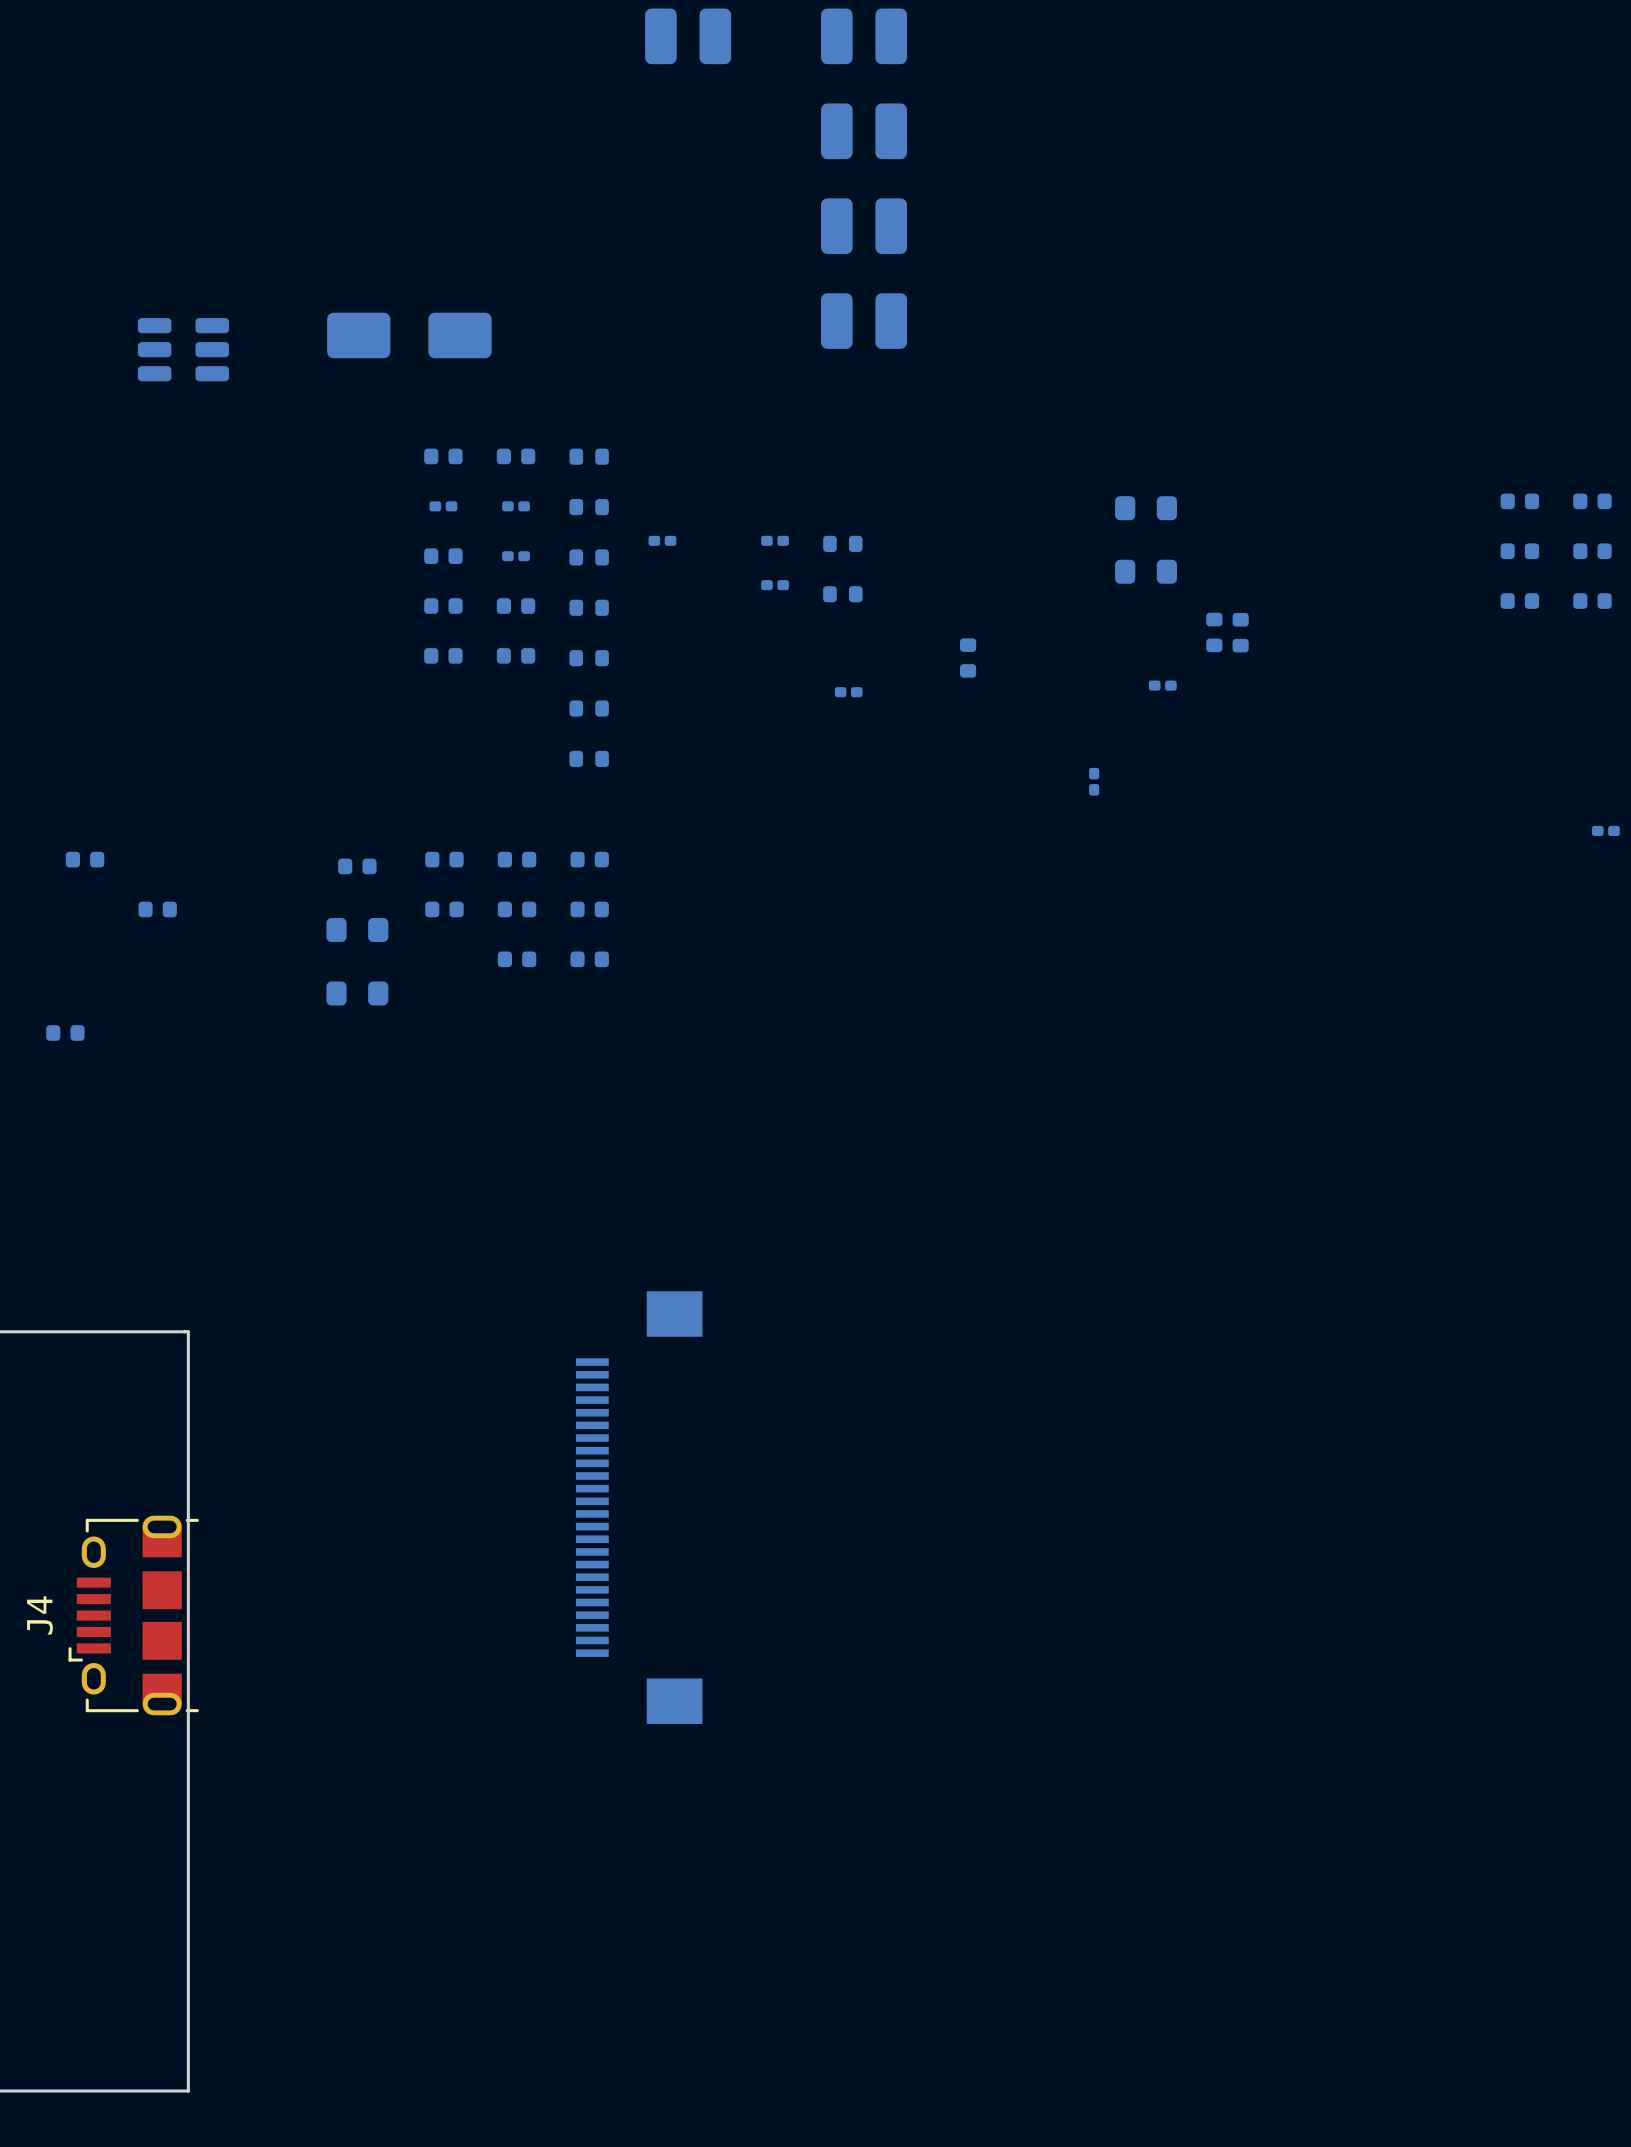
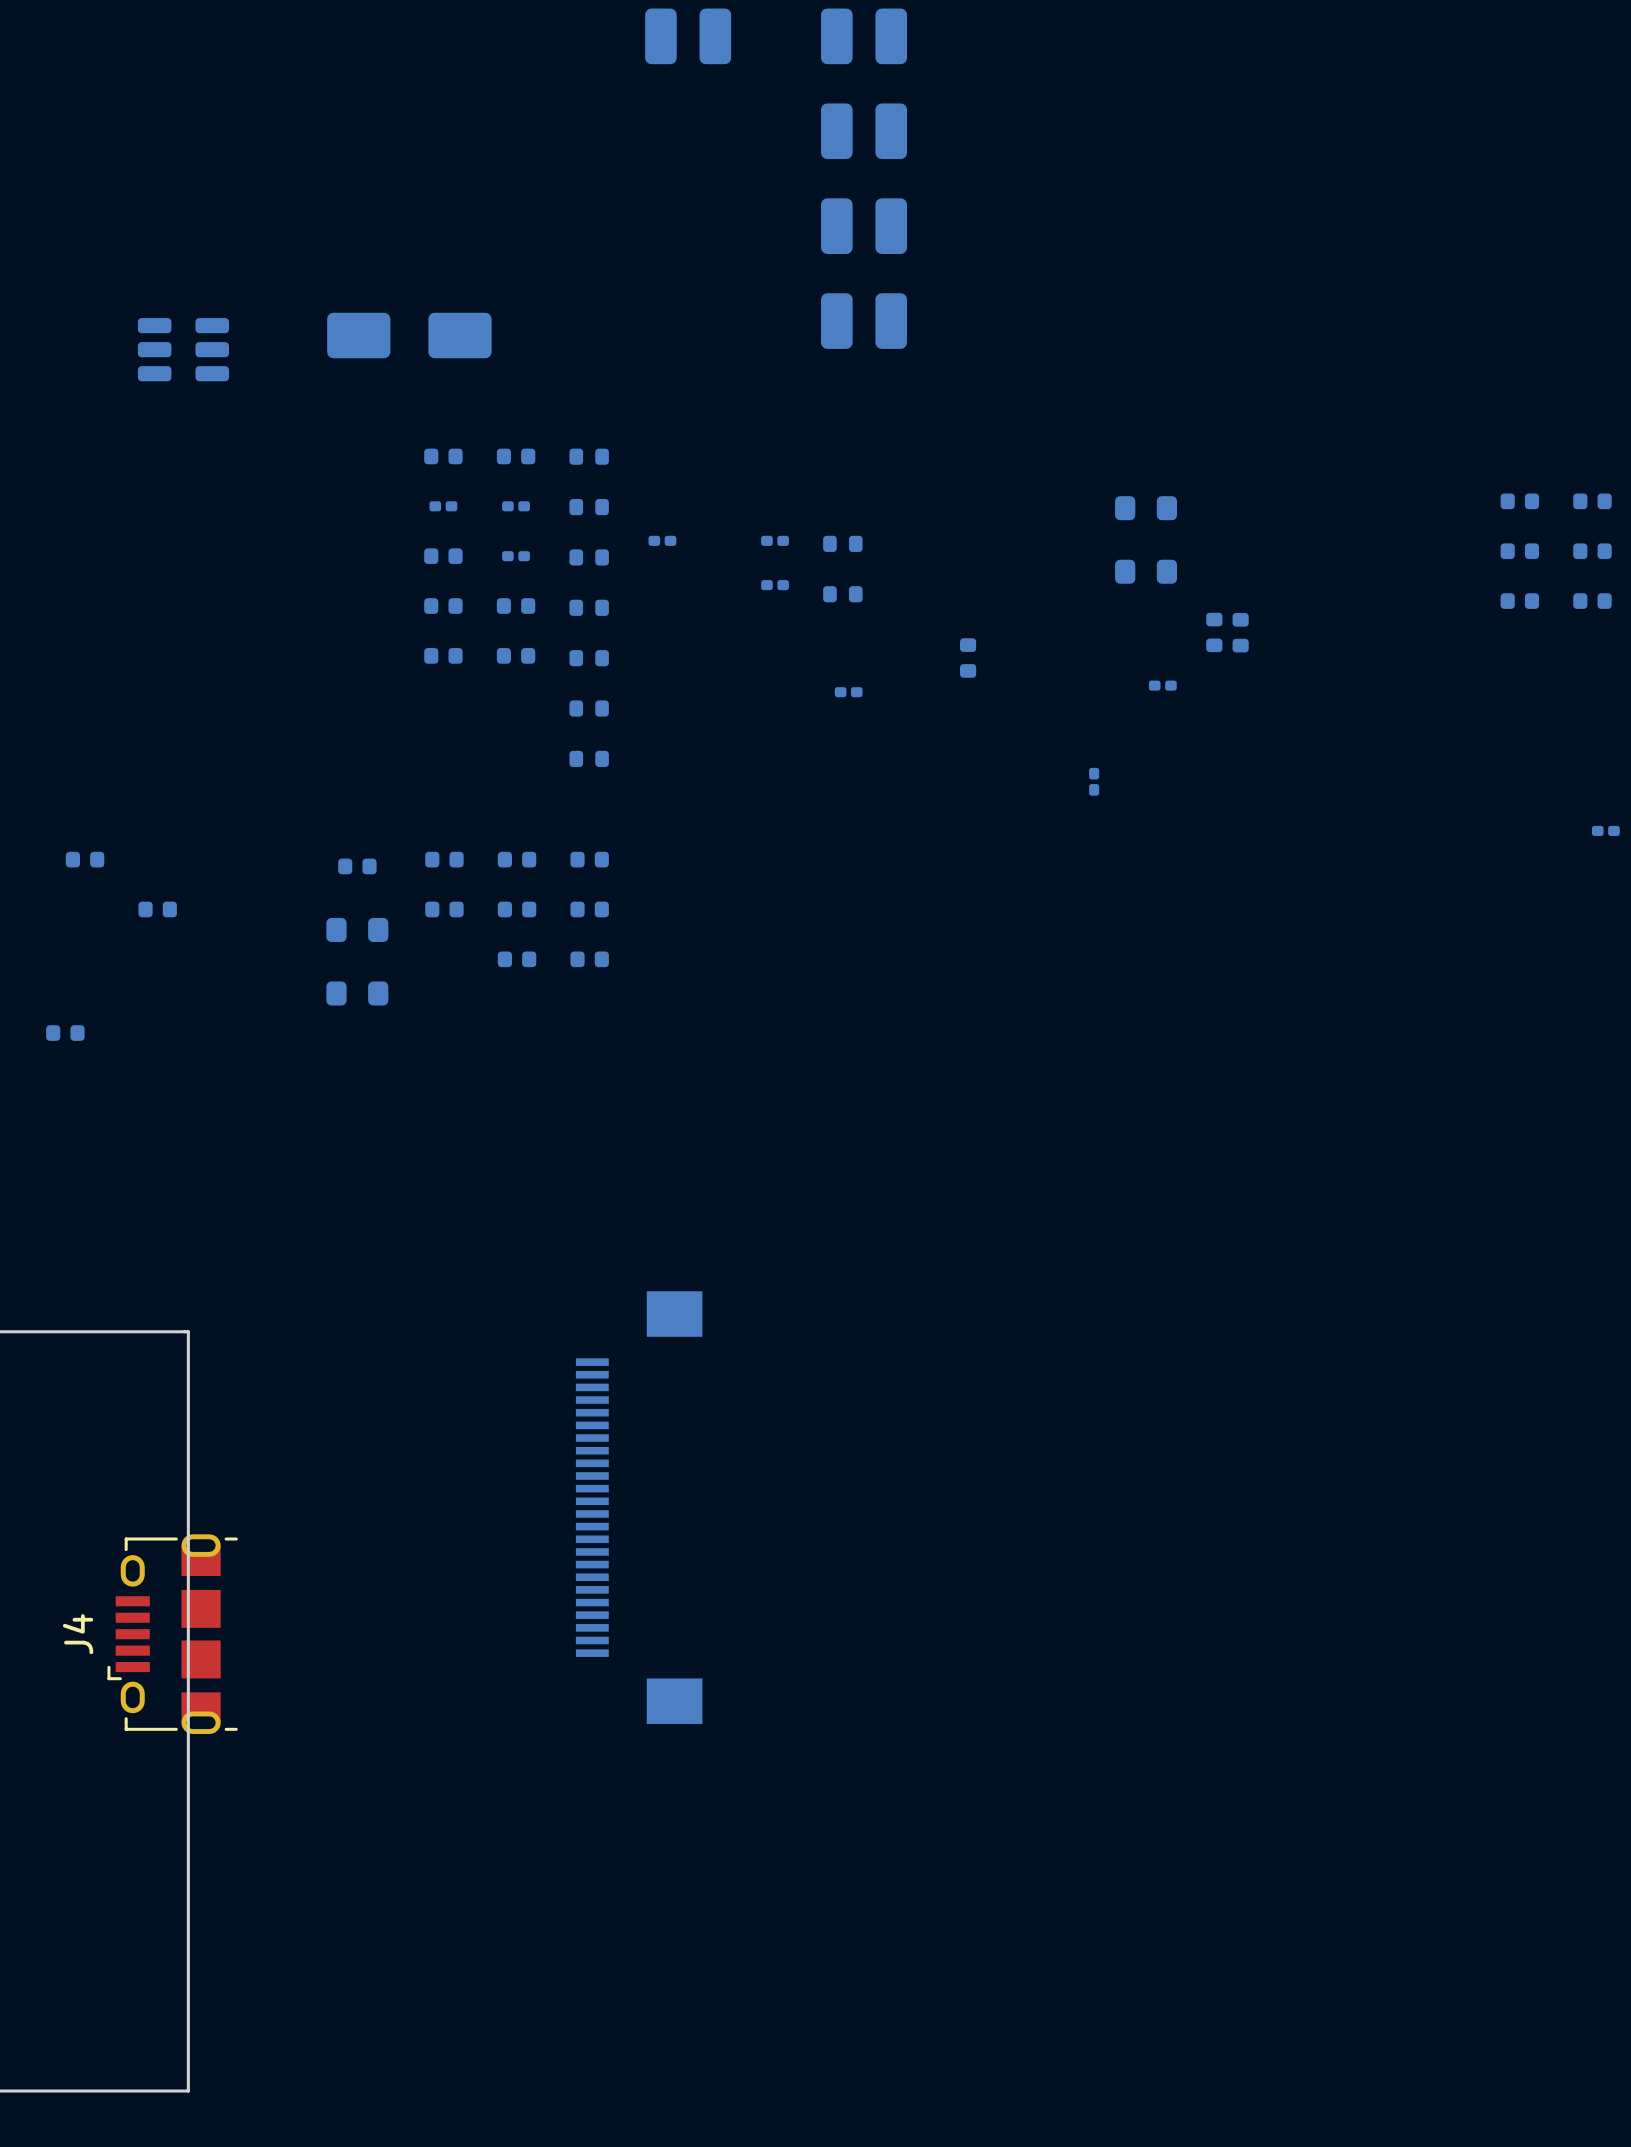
J4 position: (133, 1615) -> (172, 1634)

